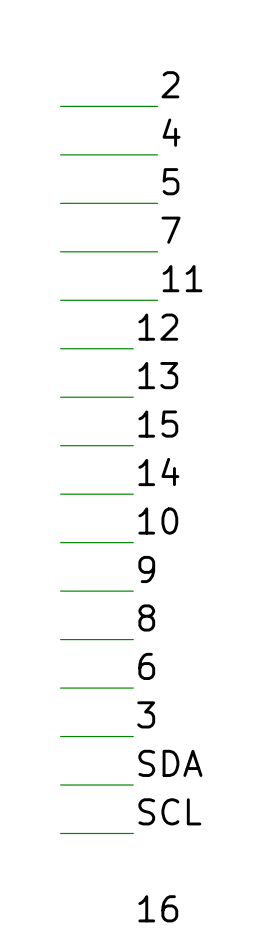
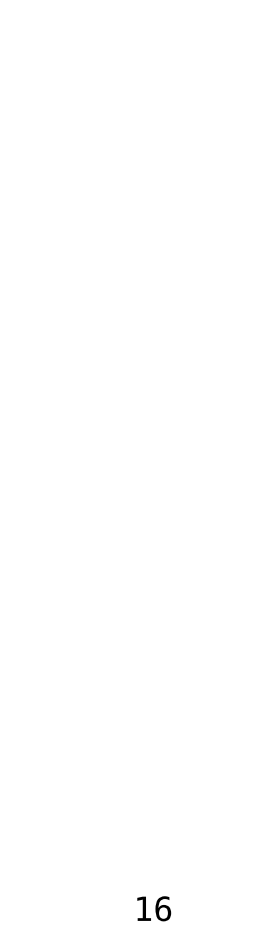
label: 2 (170, 84) -> none
wire: (60, 106) (157, 106) -> none
label: 4 (171, 132) -> none
wire: (60, 154) (157, 154) -> none
label: 5 (170, 181) -> none
wire: (60, 203) (157, 203) -> none
label: 7 (170, 230) -> none
wire: (60, 251) (157, 251) -> none
label: 11 (182, 278) -> none
wire: (60, 300) (157, 300) -> none
label: 12 (158, 327) -> none
wire: (60, 348) (133, 348) -> none
label: 13 (158, 375) -> none
wire: (60, 397) (133, 397) -> none
label: 15 (158, 424) -> none
wire: (60, 445) (133, 445) -> none
label: 14 (158, 471) -> none
wire: (60, 494) (133, 494) -> none
label: 10 (158, 521) -> none
wire: (60, 542) (133, 542) -> none
label: 9 (146, 569) -> none
wire: (60, 591) (133, 591) -> none
label: 8 (146, 617) -> none
wire: (60, 639) (133, 639) -> none
label: 6 (146, 666) -> none
wire: (60, 688) (133, 688) -> none
label: 3 (146, 714) -> none
wire: (60, 736) (133, 736) -> none
label: SDA (170, 763) -> none
wire: (60, 785) (133, 785) -> none
label: SCL (169, 811) -> none
wire: (60, 833) (133, 833) -> none

